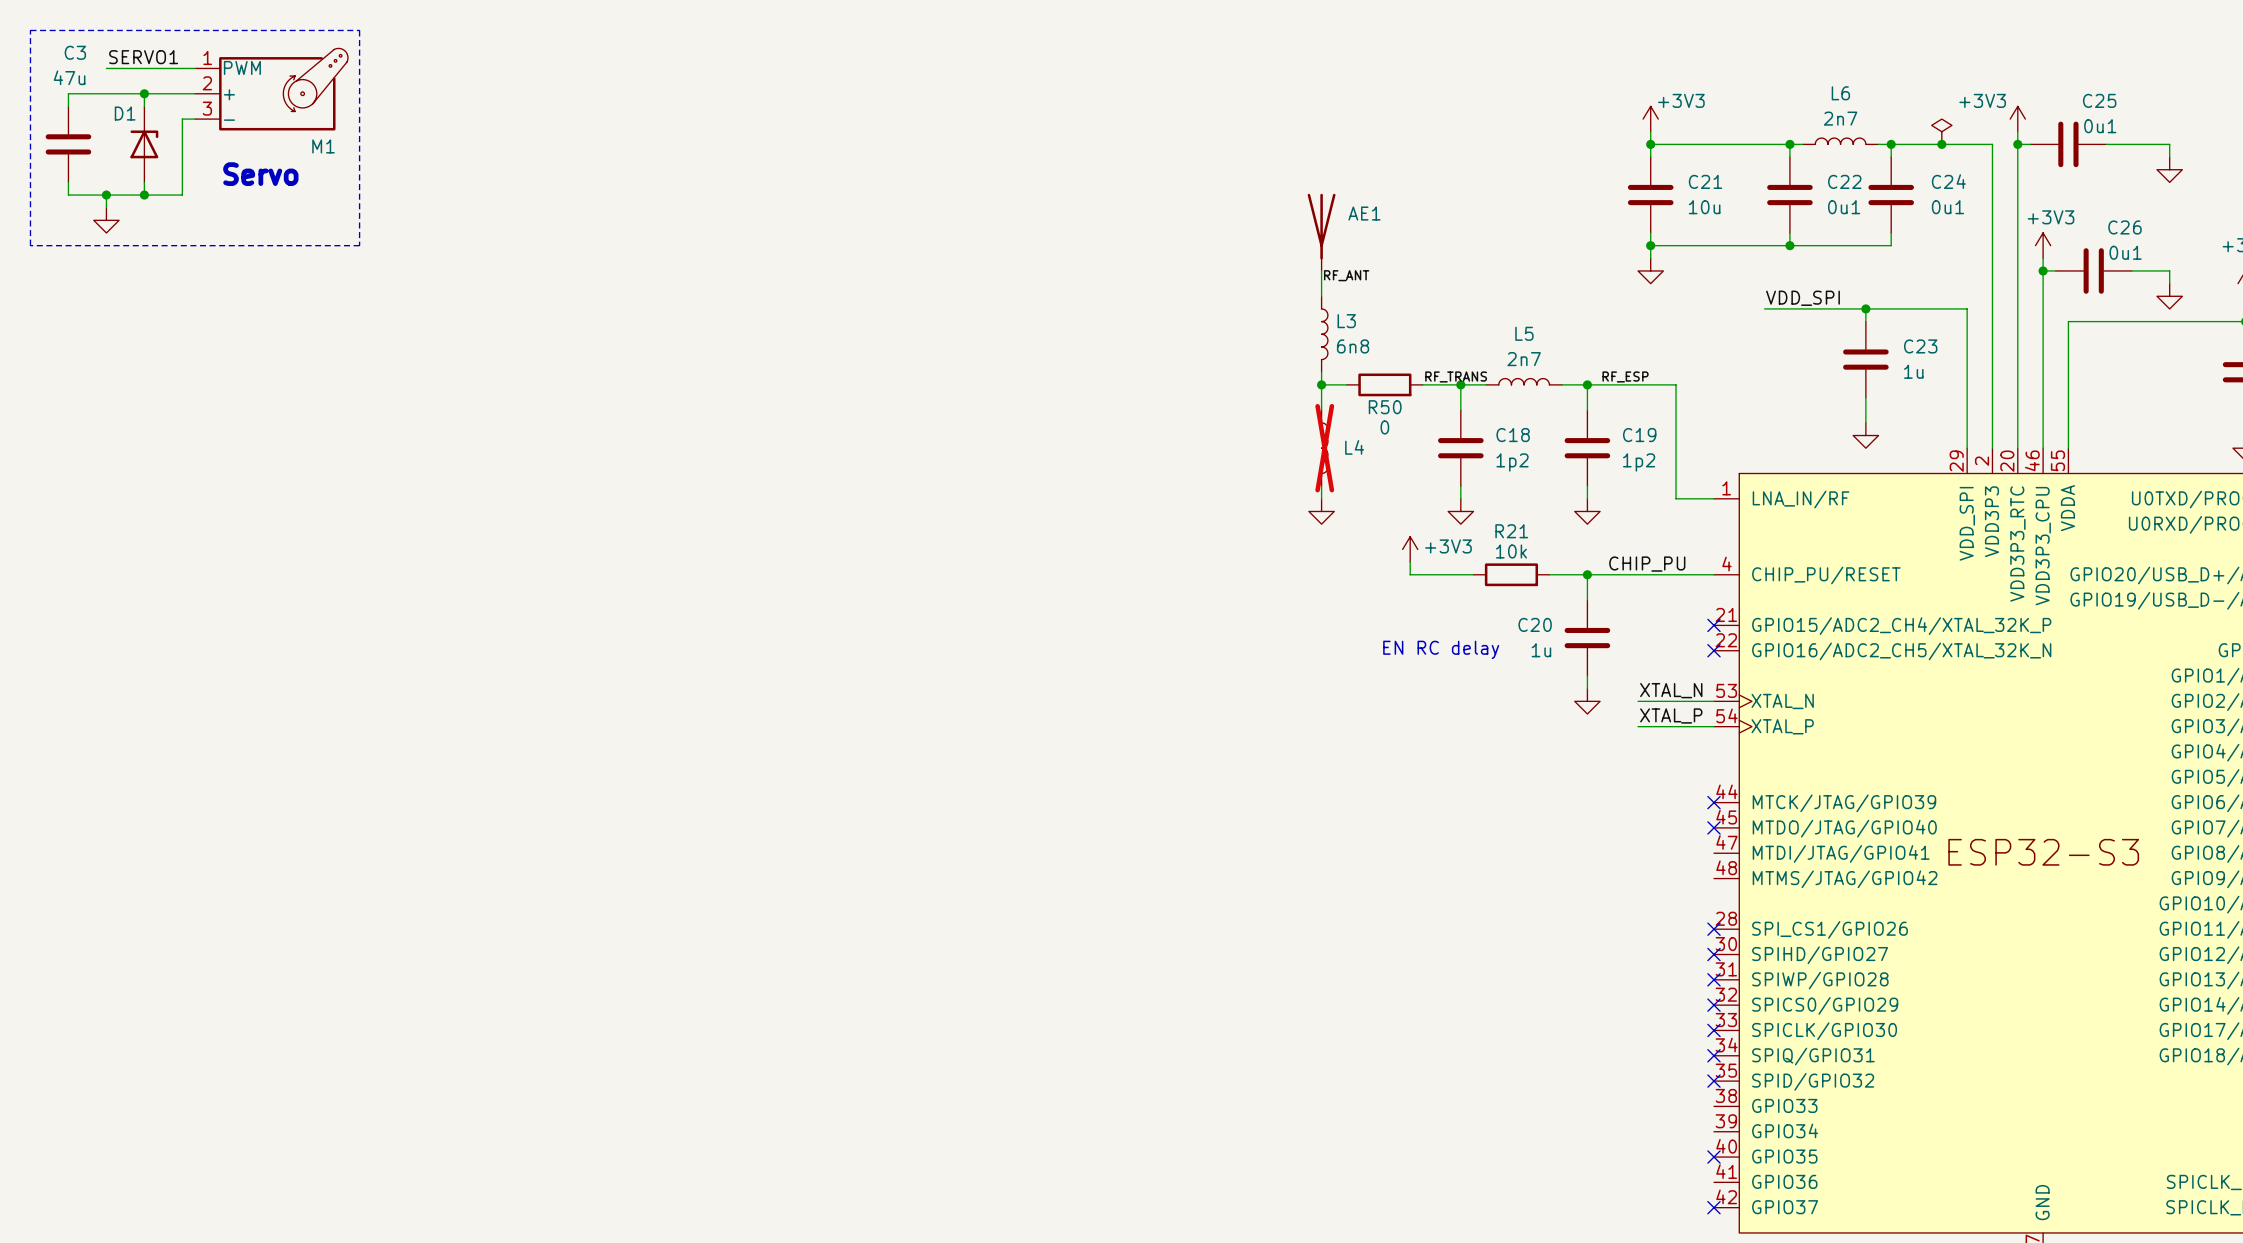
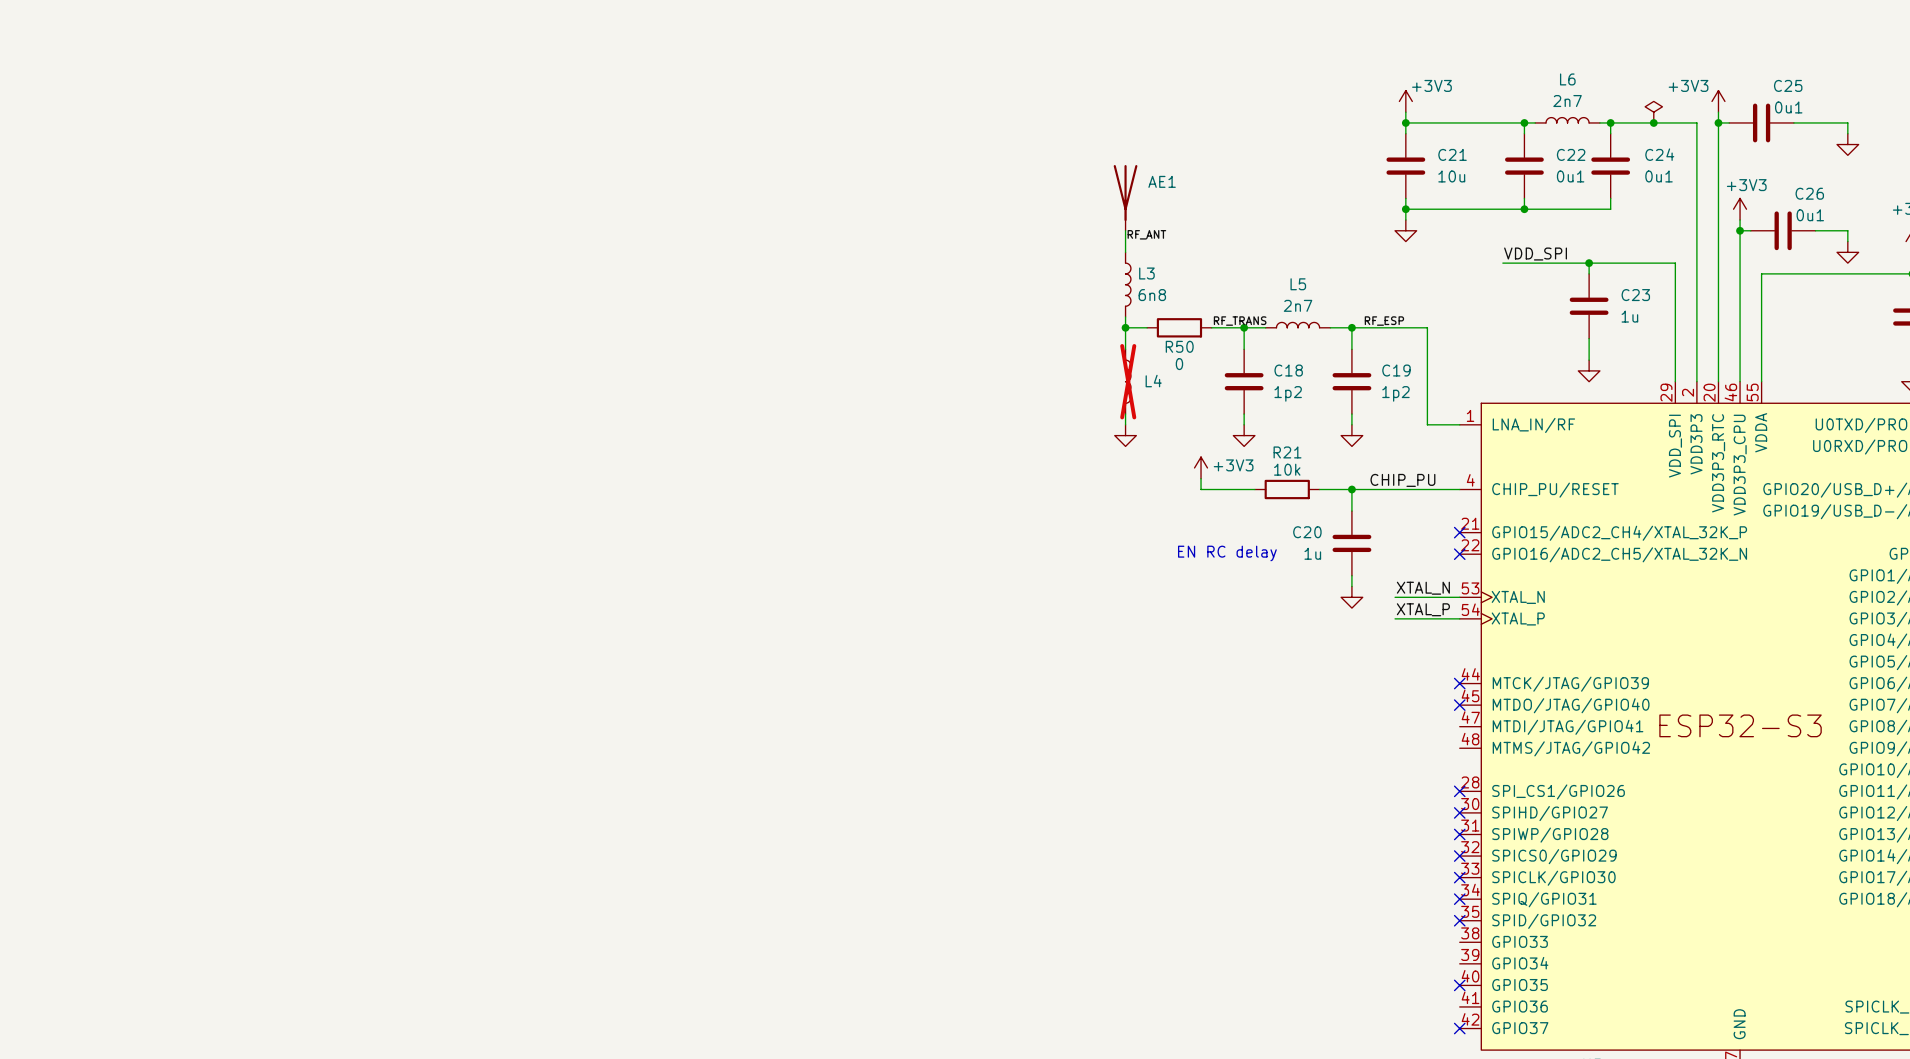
line: (30, 30) (359, 30) (359, 245) (30, 245) (30, 30) -> none
label: SERVO1 (143, 57) -> none
wire: (106, 68) (195, 68) -> none
M1: (271, 89) -> none
wire: (144, 93) (144, 106) -> none
junction: (144, 93) -> none
wire: (195, 93) (68, 93) (68, 106) -> none
wire: (195, 119) (182, 119) (182, 195) (68, 195) (68, 182) -> none
C3: 47u (68, 144) -> none
D1: (144, 144) -> none
text: Servo (260, 174) -> none
wire: (144, 182) (144, 195) -> none
wire: (106, 195) (106, 207) -> none
junction: (106, 195) -> none
junction: (144, 195) -> none
power symbol: (106, 220) -> none

